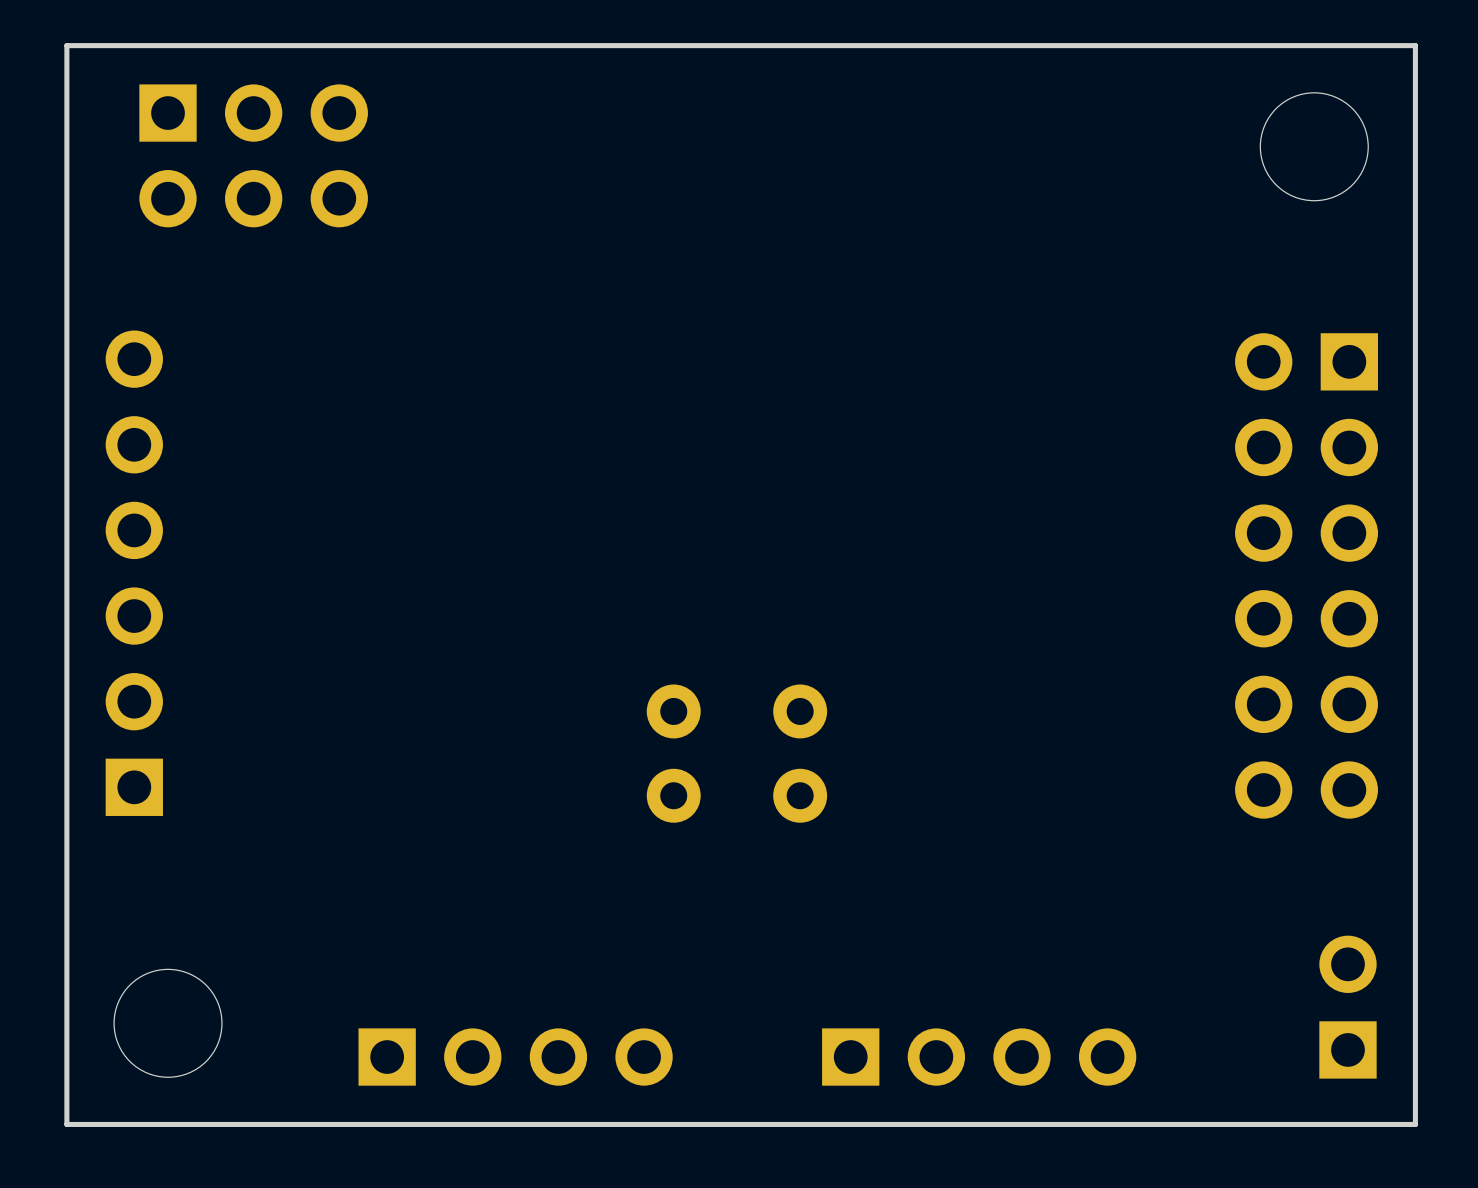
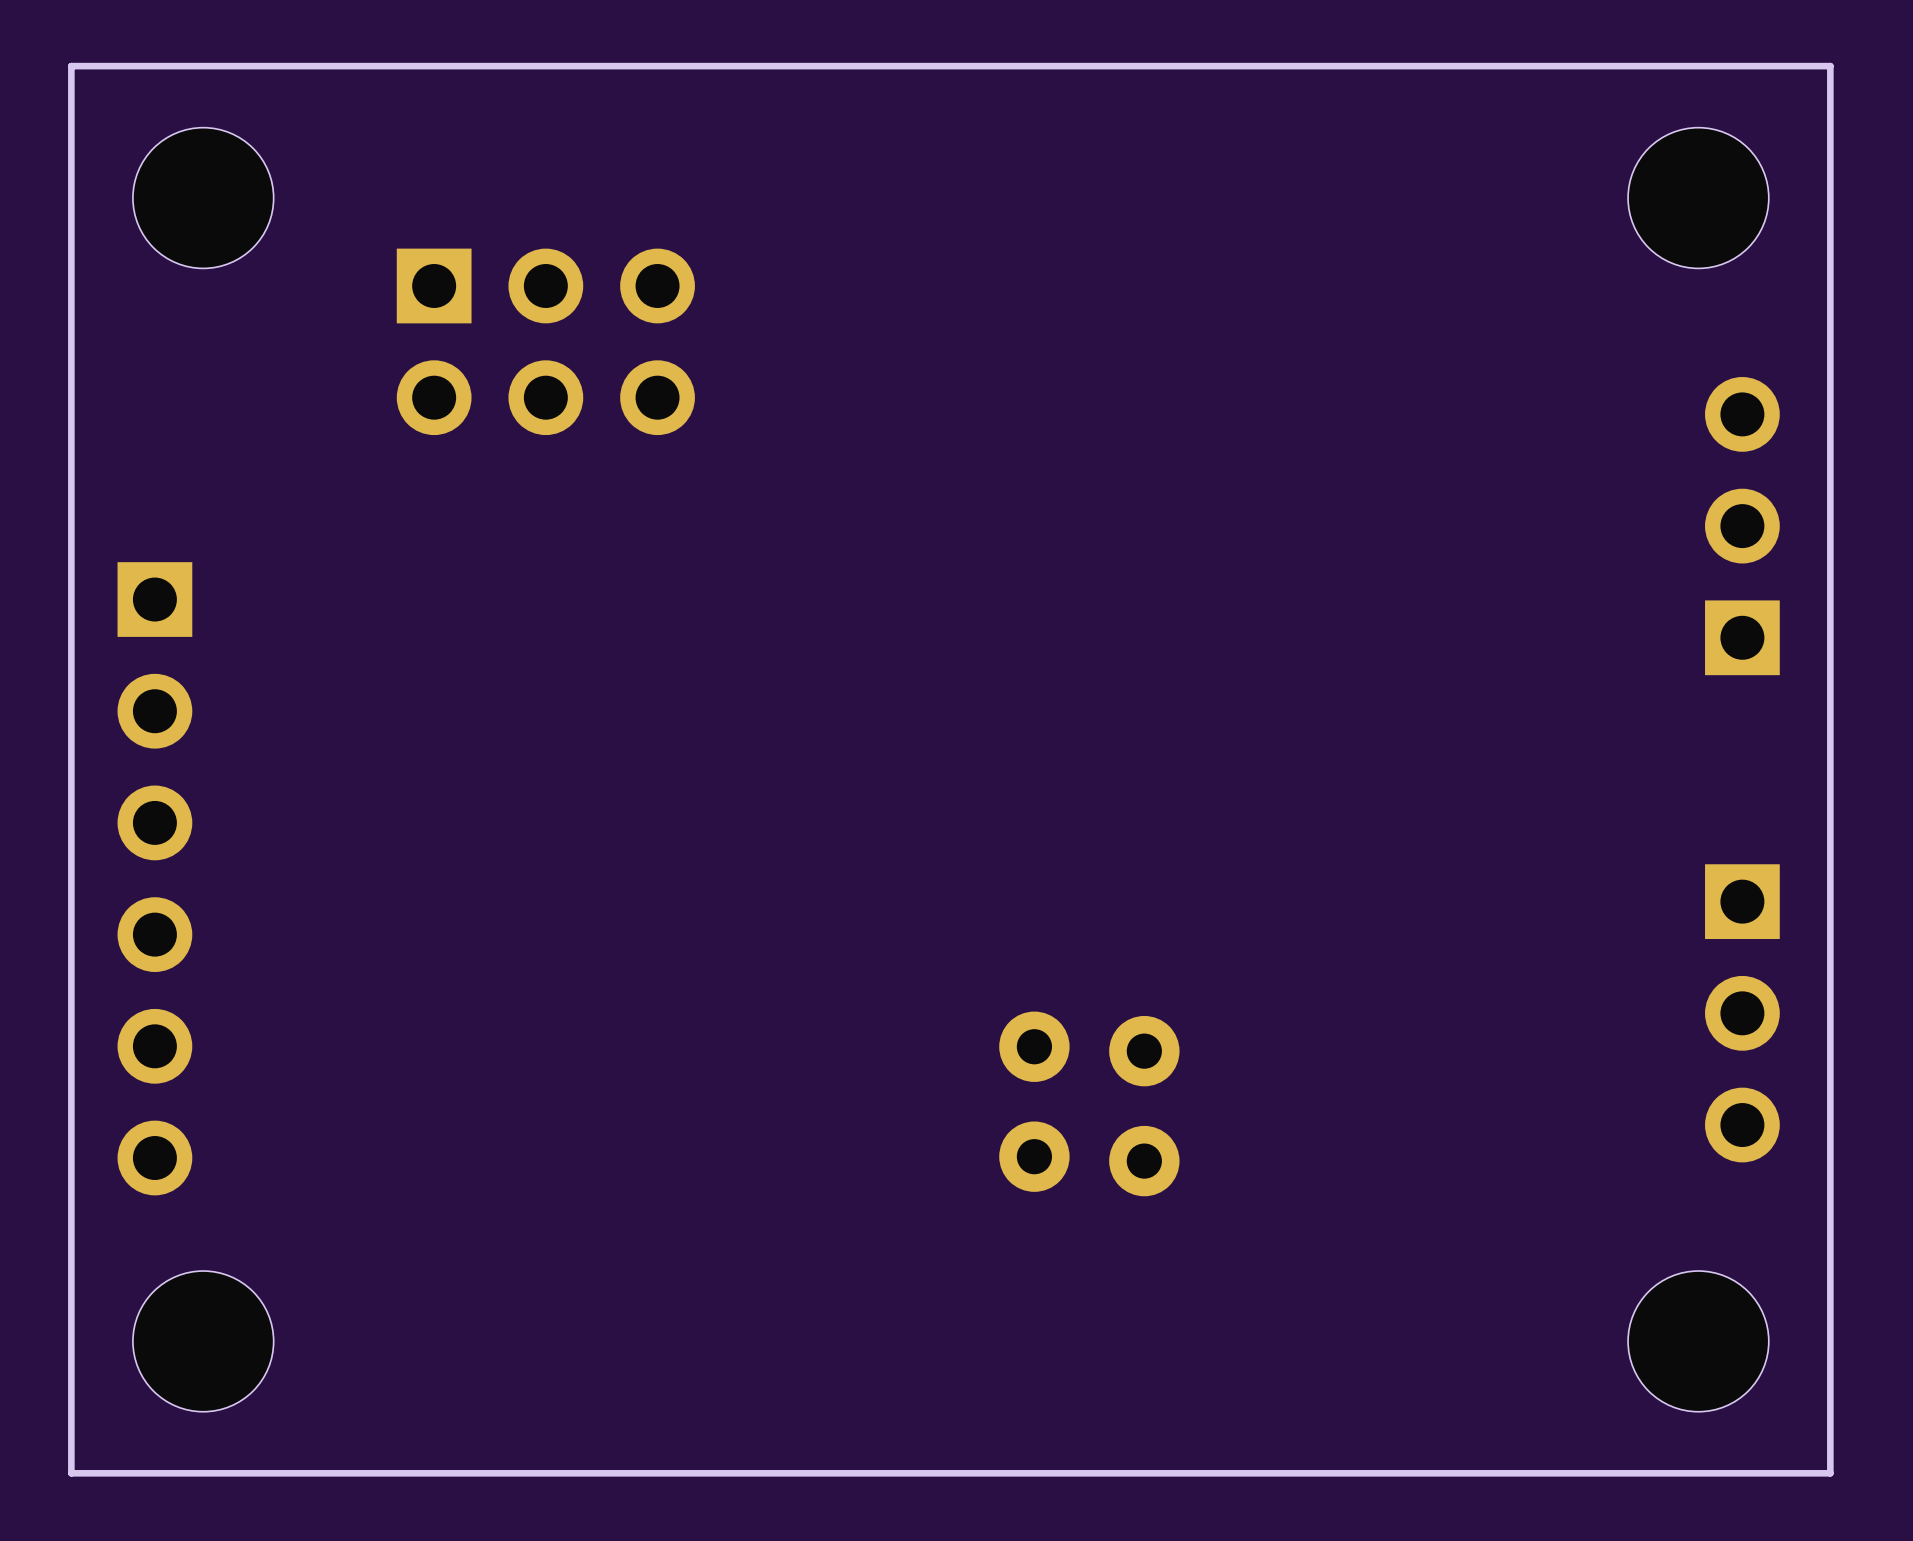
part: none -> (203, 198)
part position: (253, 155) -> (545, 341)
part: none -> (1742, 526)
part rotation: 0° (134, 573) -> 180° (154, 878)
part: (1306, 575) -> none
part: (673, 753) -> none
part: (800, 753) -> none
part: none -> (1742, 1013)
part: none -> (1034, 1101)
part: none -> (1144, 1106)
part: (1348, 1007) -> none
part: none -> (1698, 1341)
part: (515, 1057) -> none
part: (979, 1057) -> none

